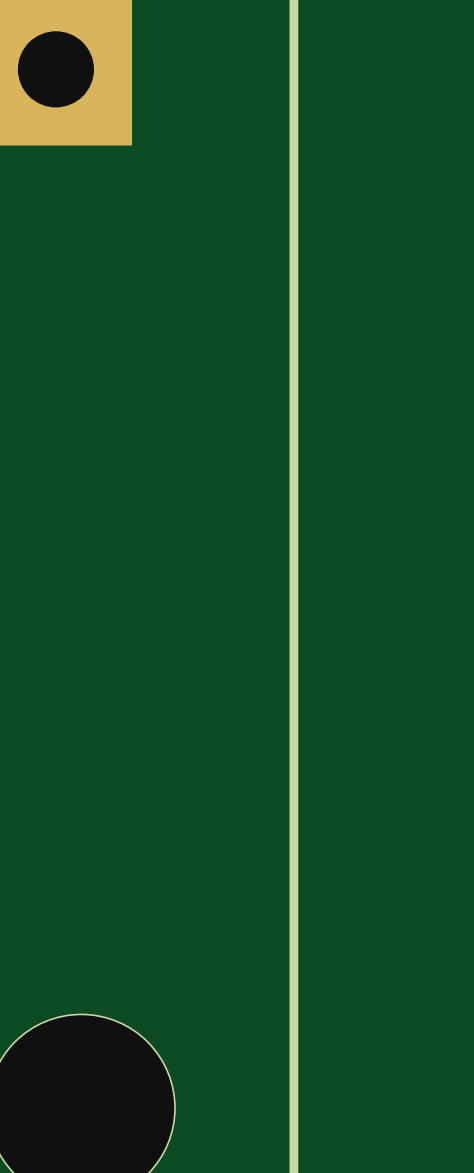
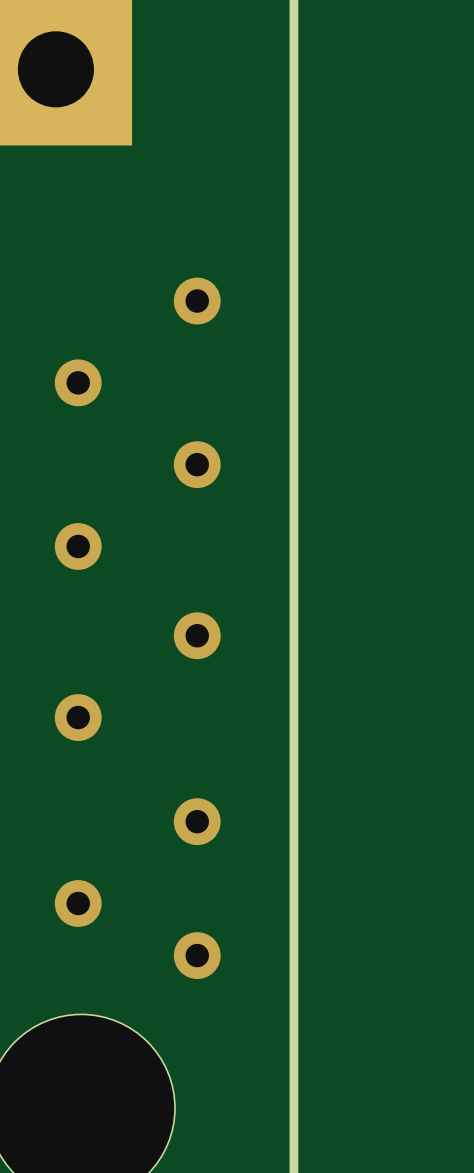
via: none -> (197, 301)
via: none -> (78, 382)
via: none -> (197, 464)
via: none -> (78, 546)
via: none -> (197, 635)
via: none -> (78, 717)
via: none -> (197, 821)
via: none -> (78, 903)
via: none -> (197, 955)

